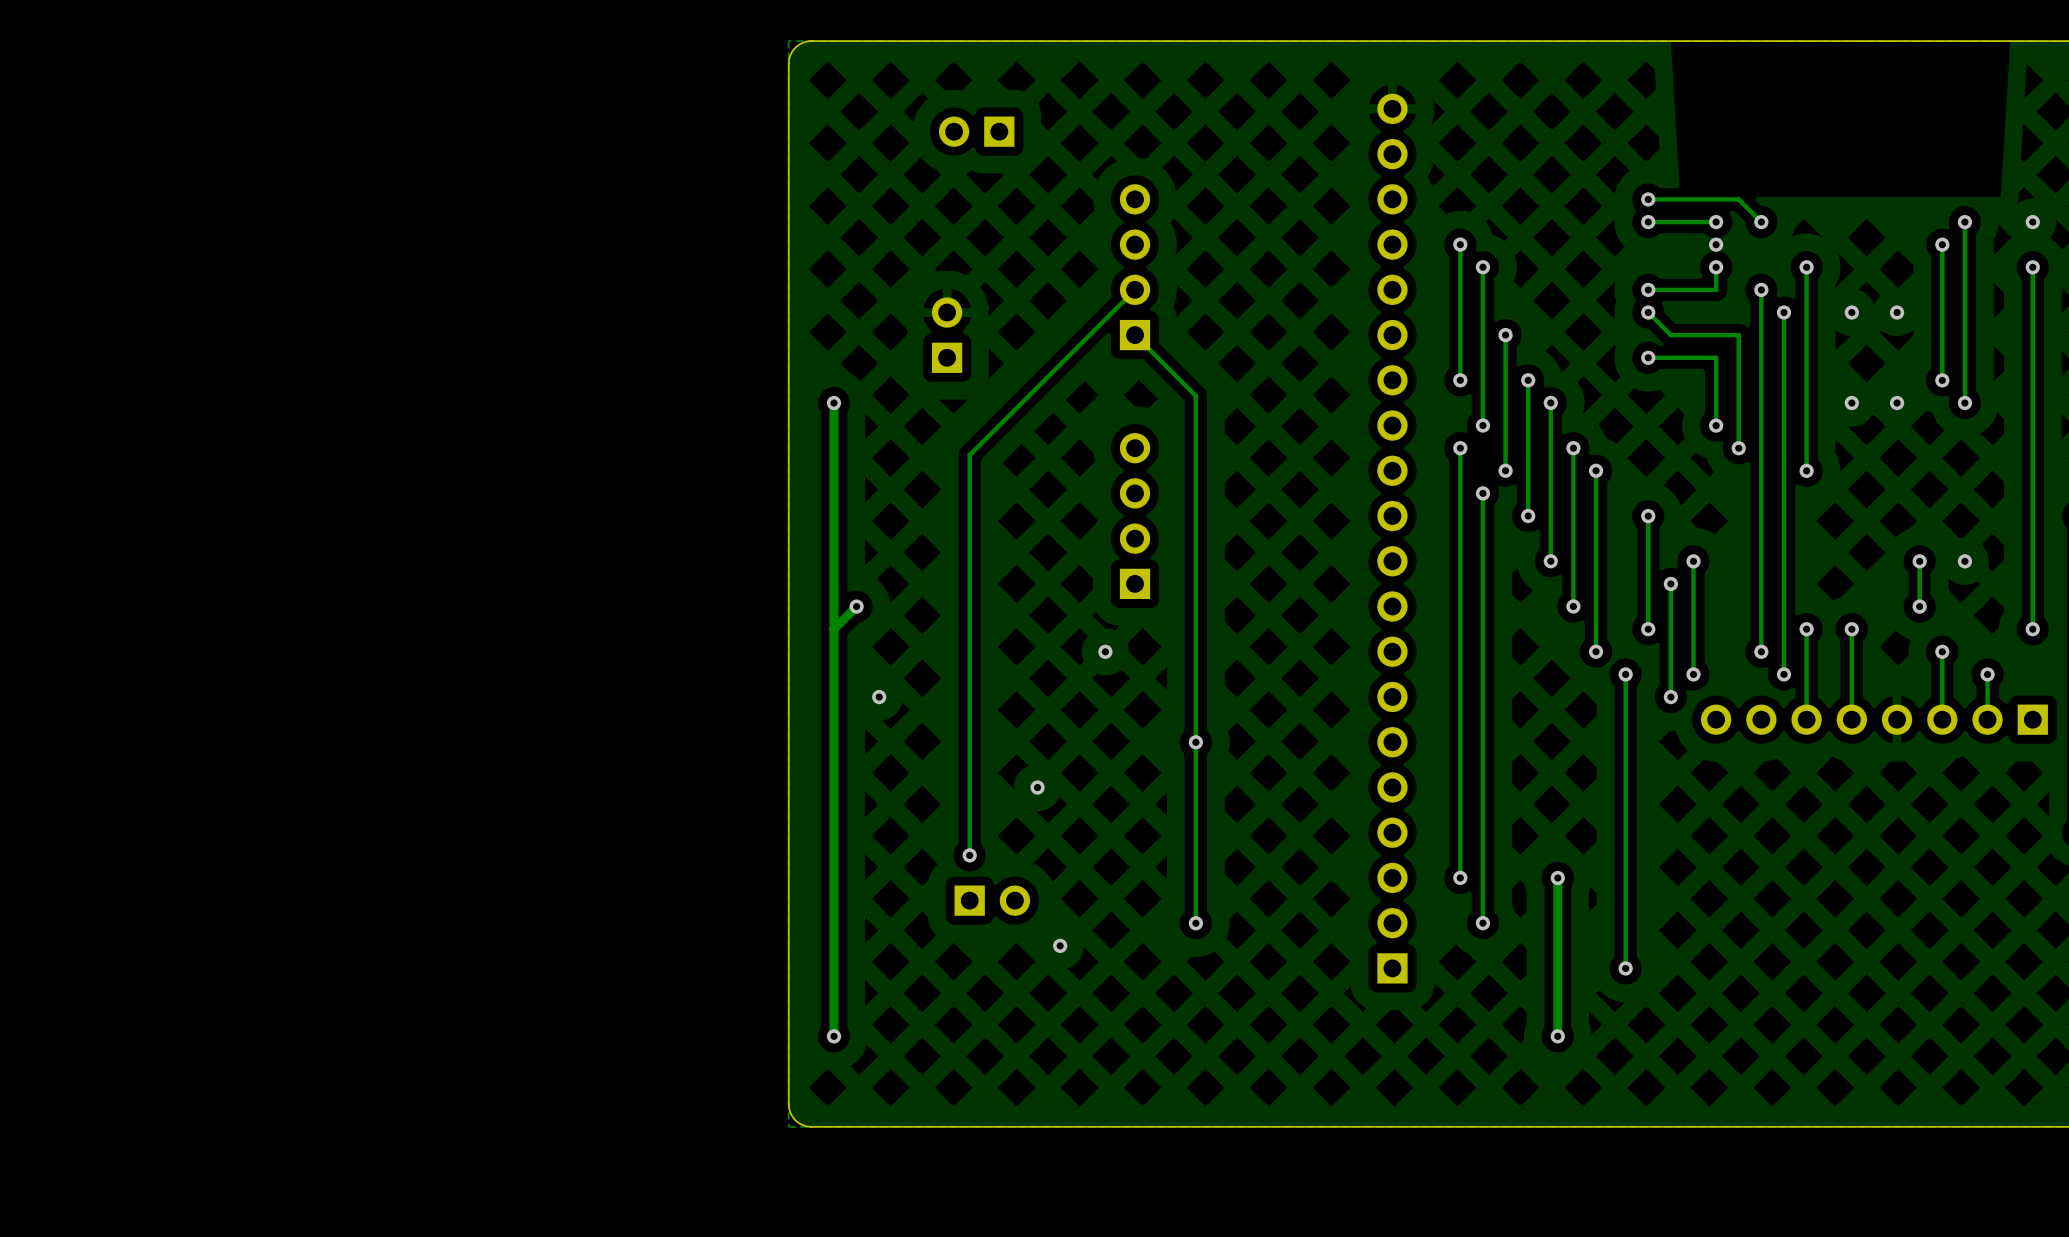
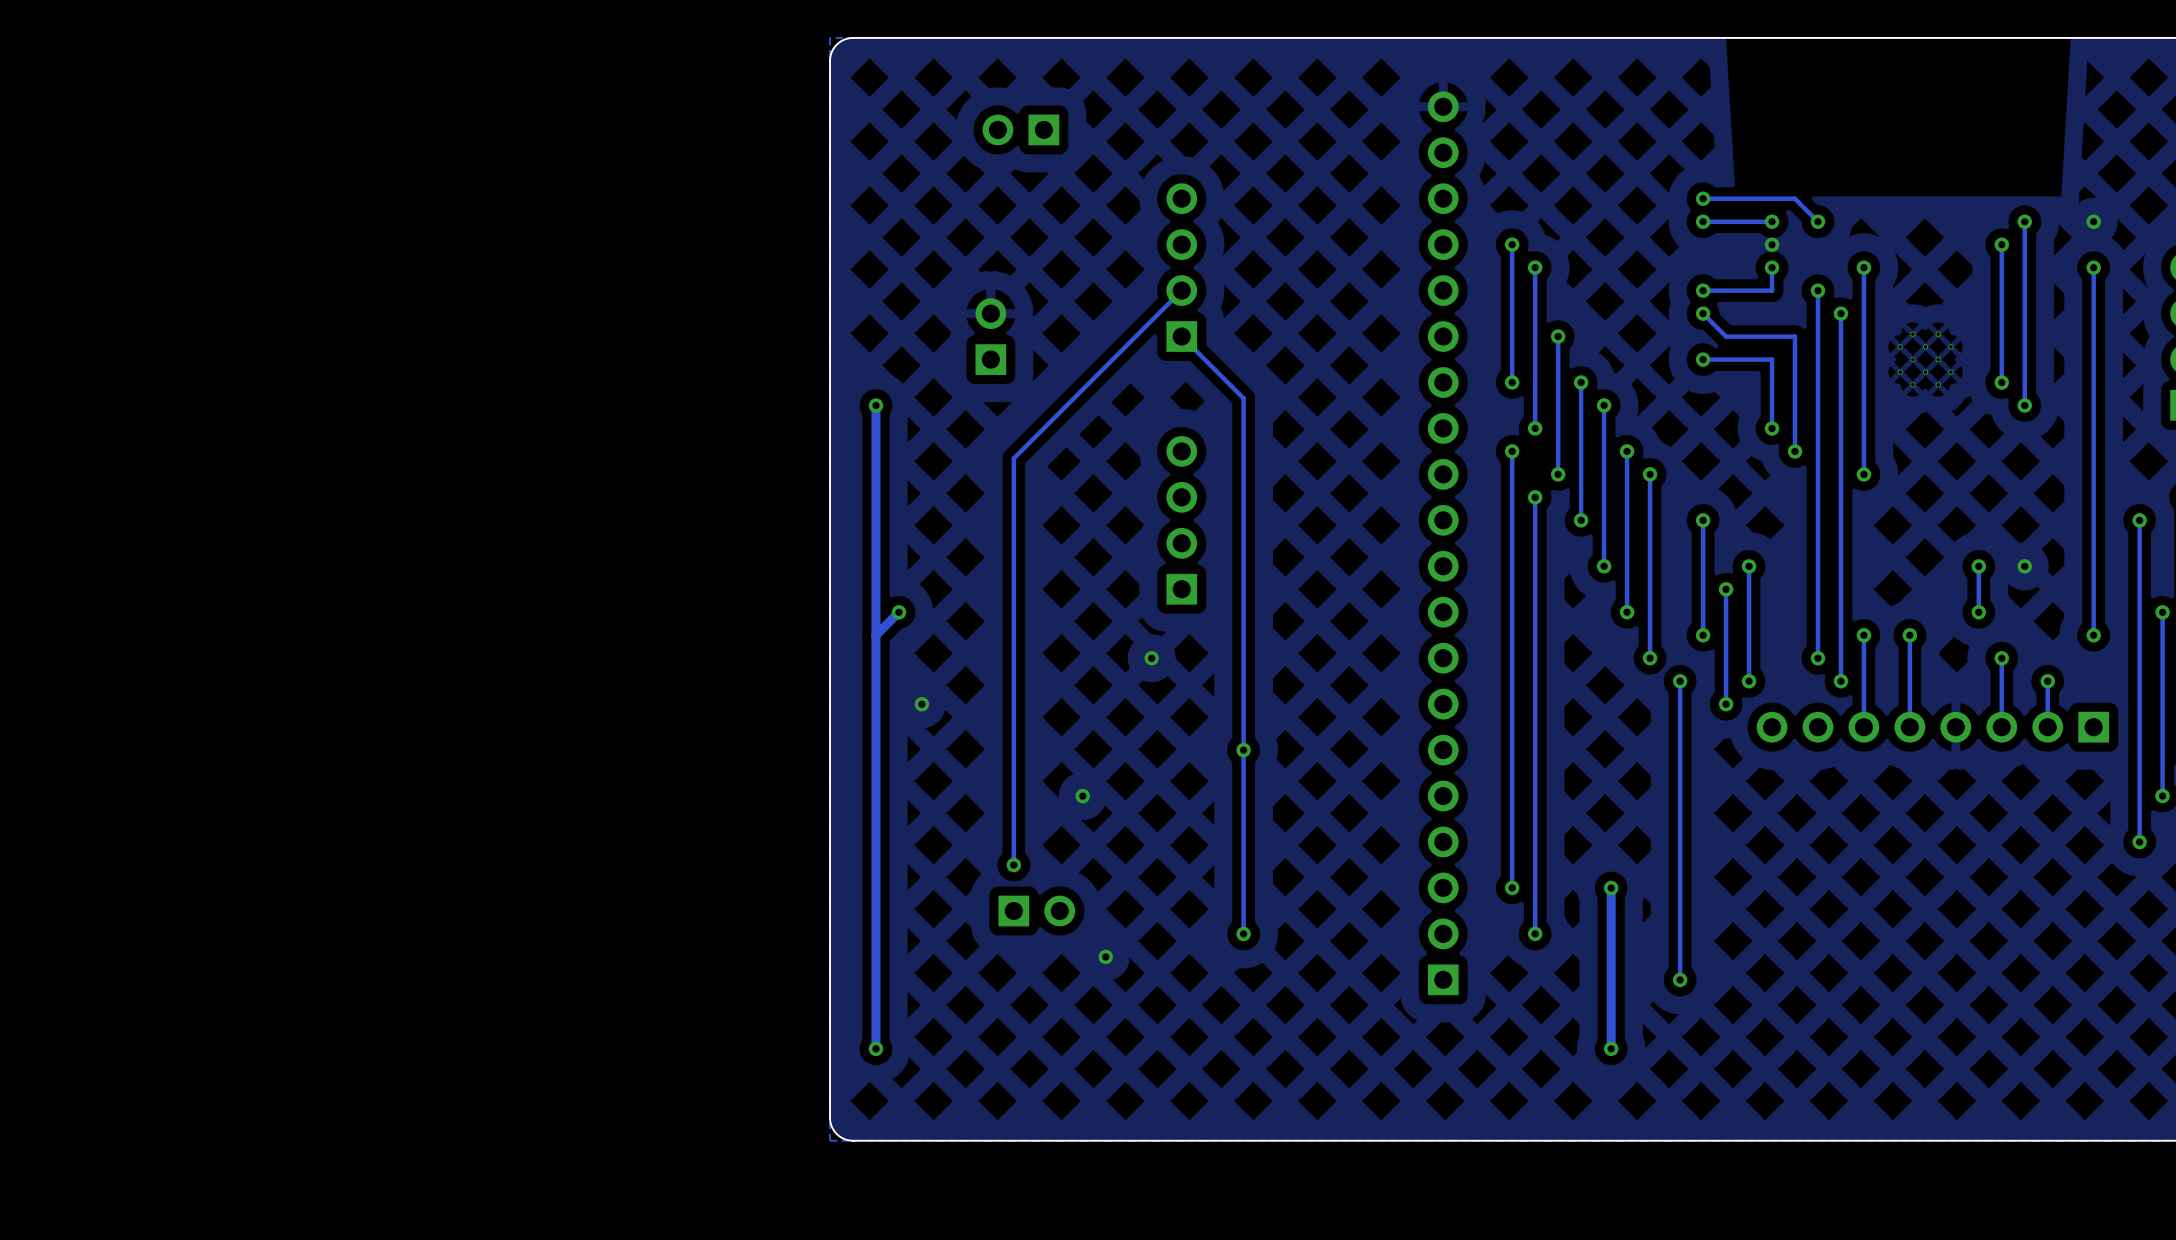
via: (1851, 312) -> none
via: (1897, 312) -> none
part: none -> (1925, 359)
via: (1851, 403) -> none
via: (1897, 403) -> none

